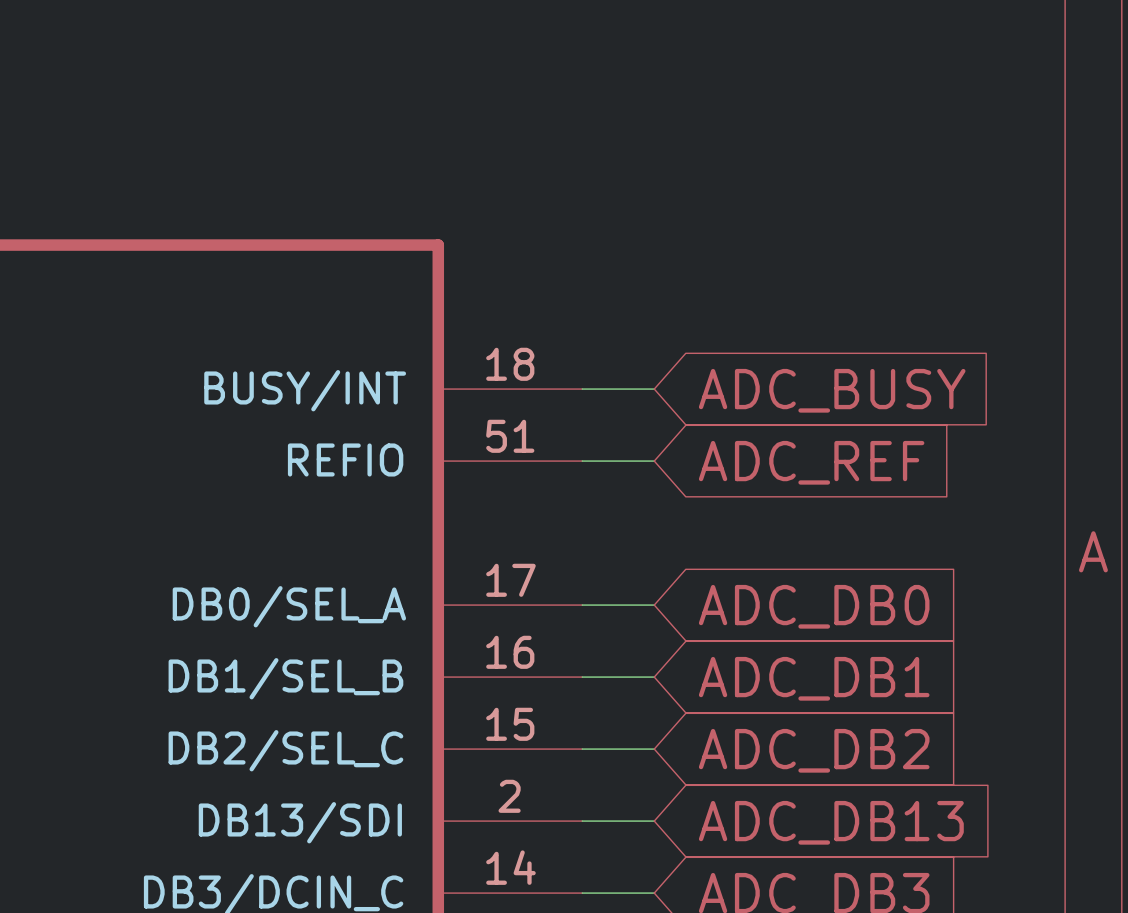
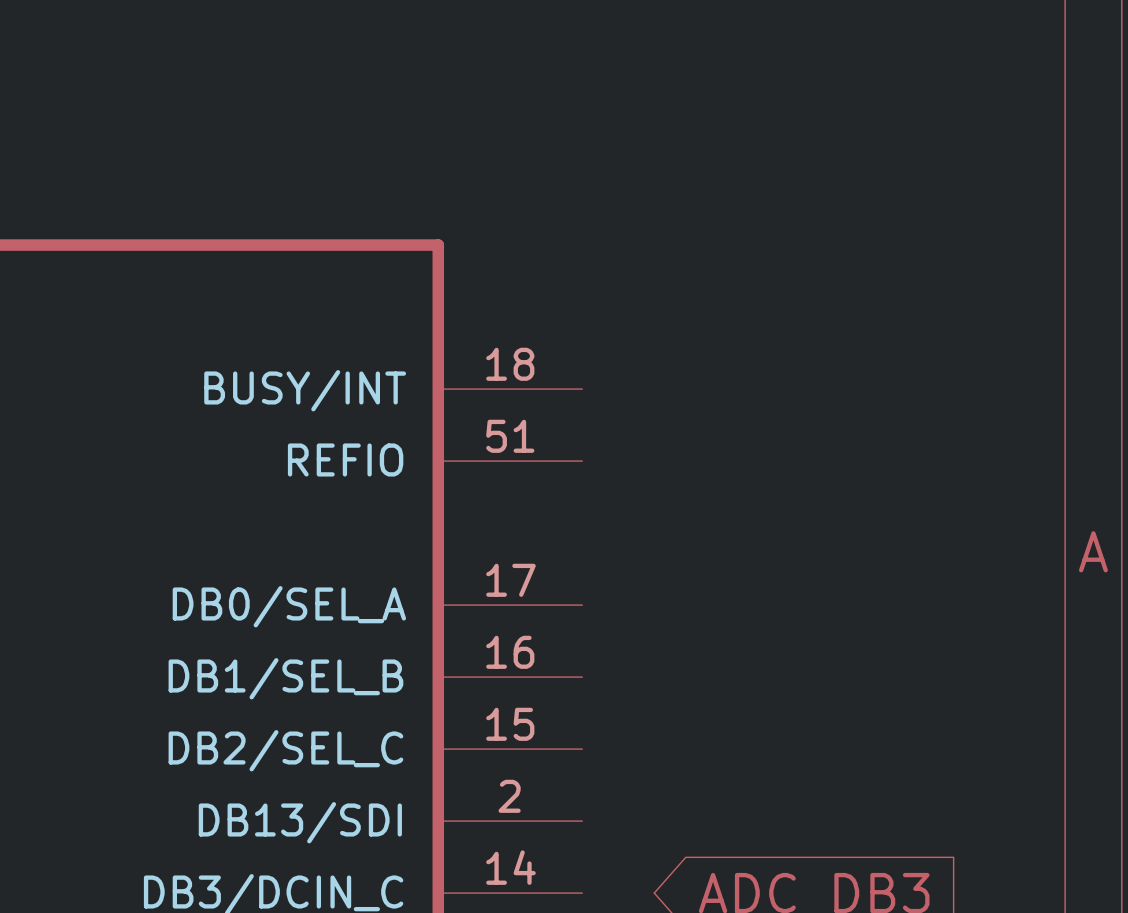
wire: (582, 389) (654, 389) -> none
global label: ADC_BUSY (832, 390) -> none
wire: (582, 461) (654, 461) -> none
global label: ADC_REF (811, 462) -> none
wire: (582, 605) (654, 605) -> none
global label: ADC_DB0 (814, 606) -> none
wire: (582, 677) (654, 677) -> none
global label: ADC_DB1 (814, 678) -> none
wire: (582, 749) (654, 749) -> none
global label: ADC_DB2 (814, 750) -> none
wire: (582, 821) (654, 821) -> none
global label: ADC_DB13 (831, 822) -> none
wire: (582, 893) (654, 893) -> none

